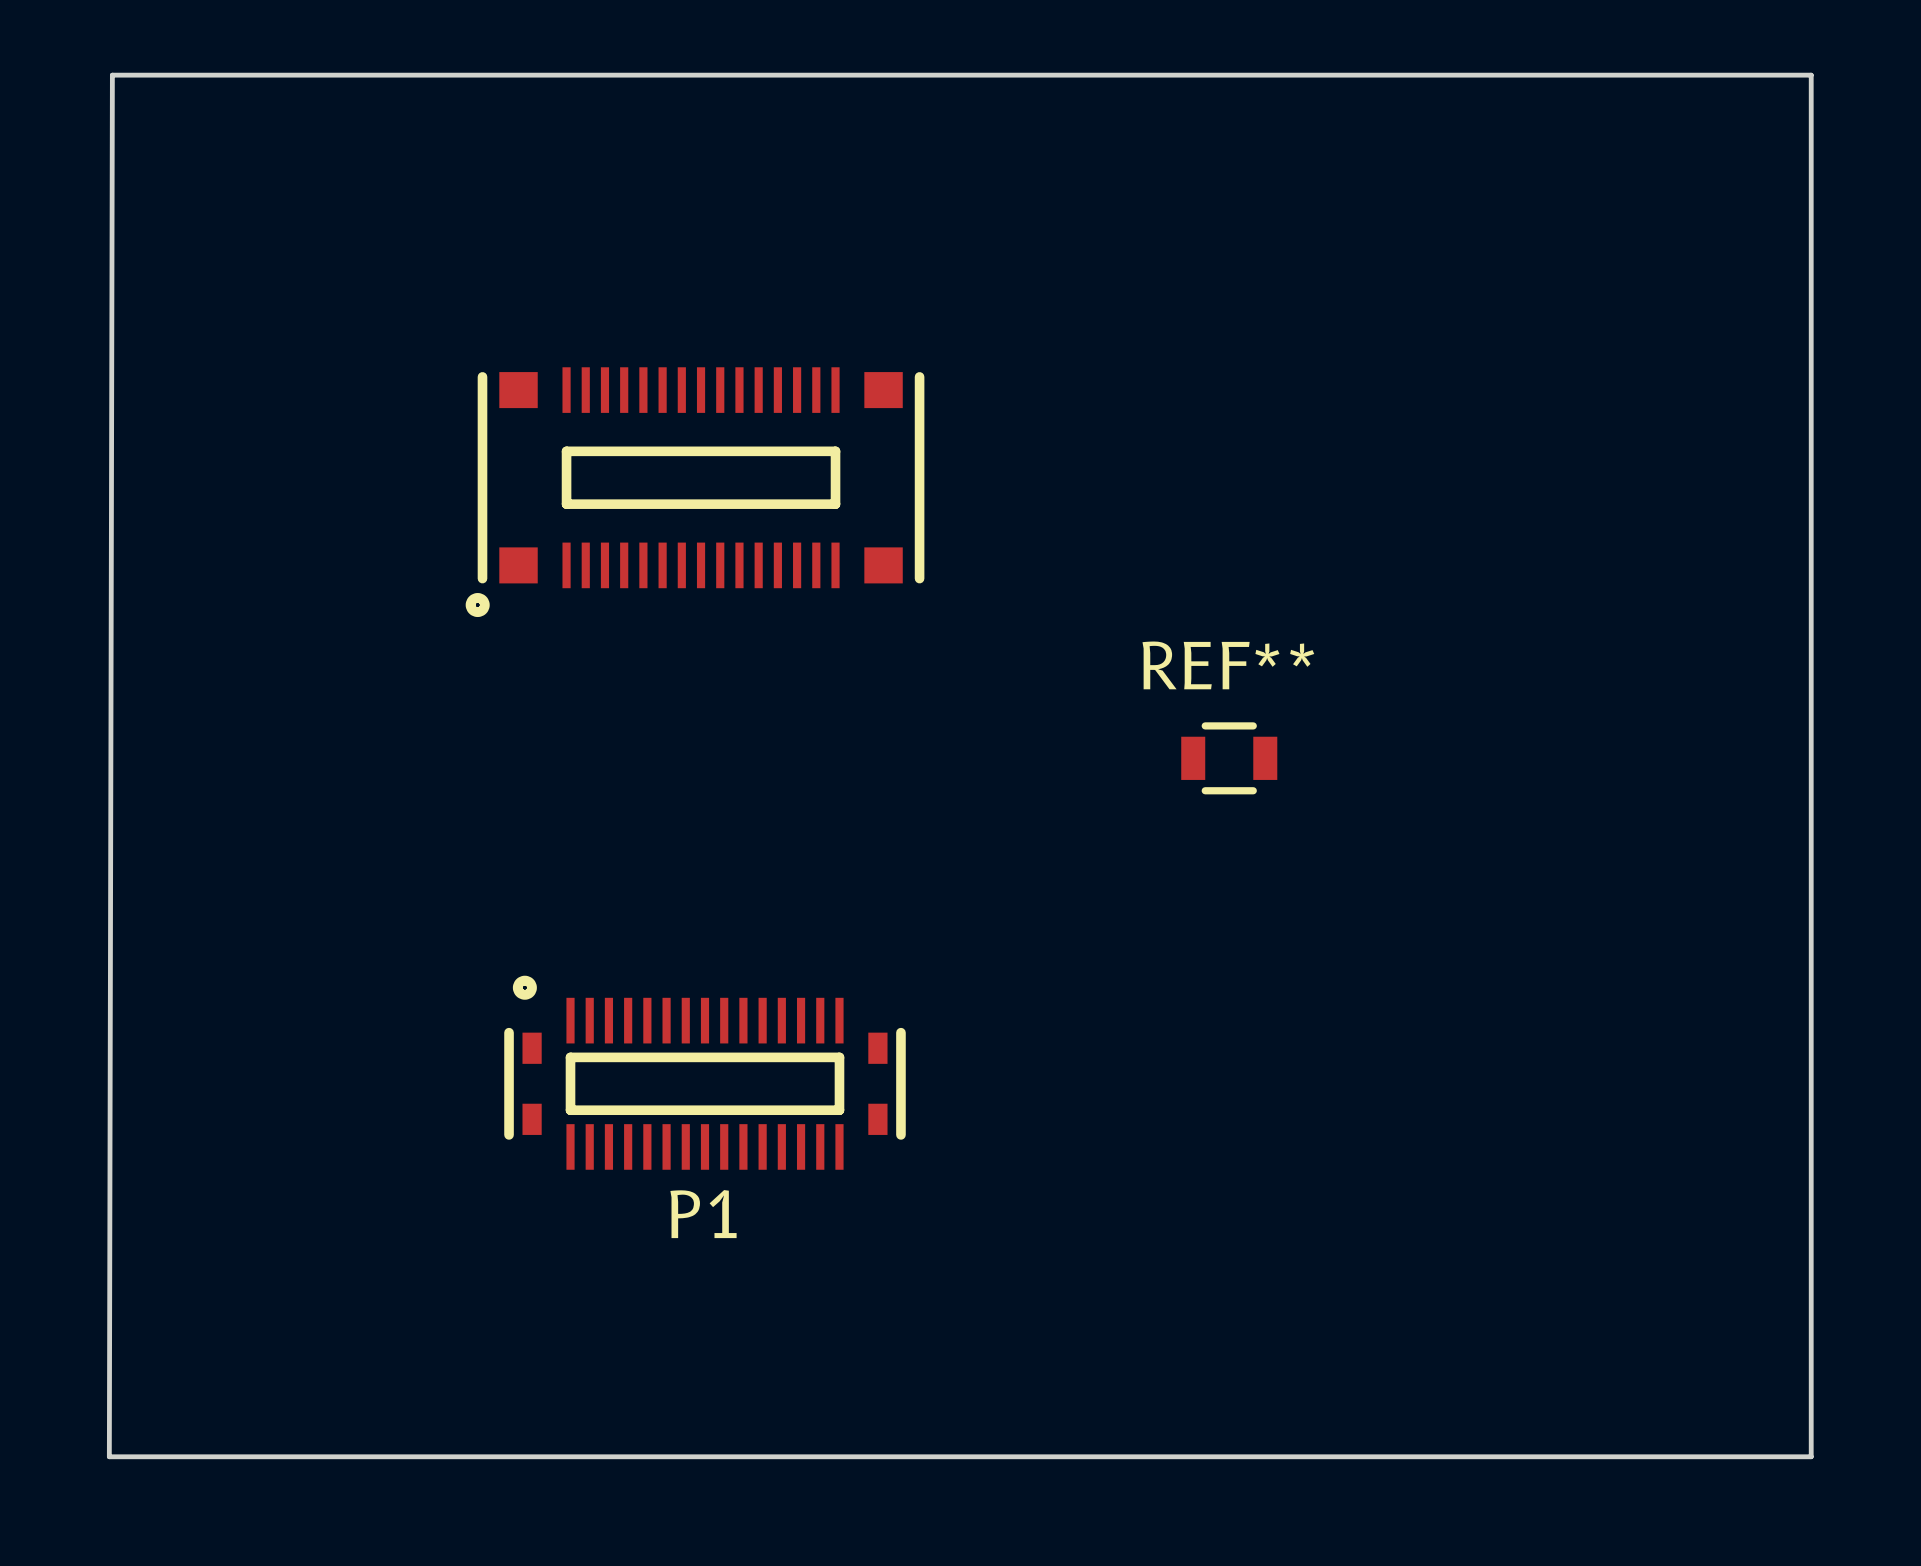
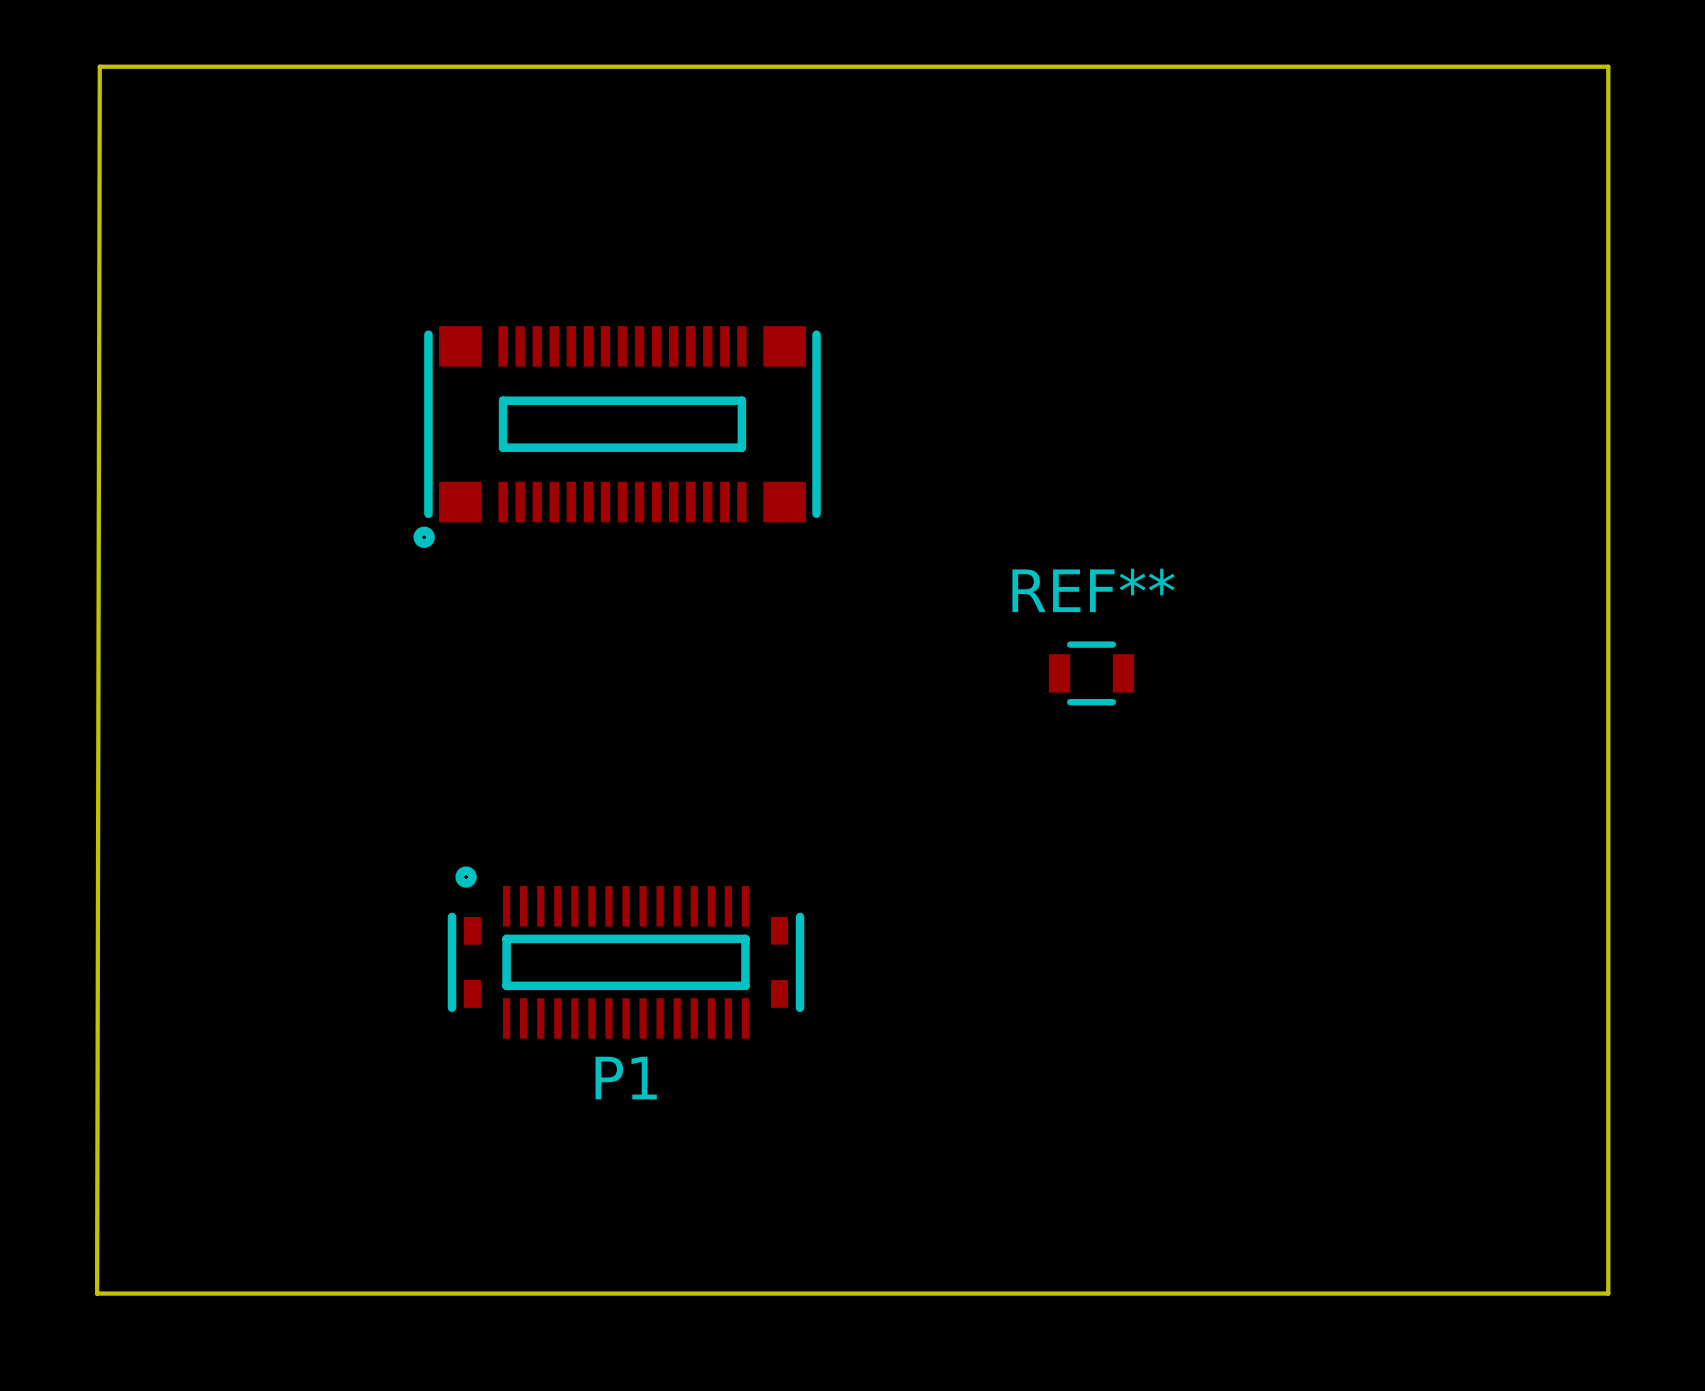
part footprint: [465, 367, 925, 618] -> [413, 326, 821, 548]

